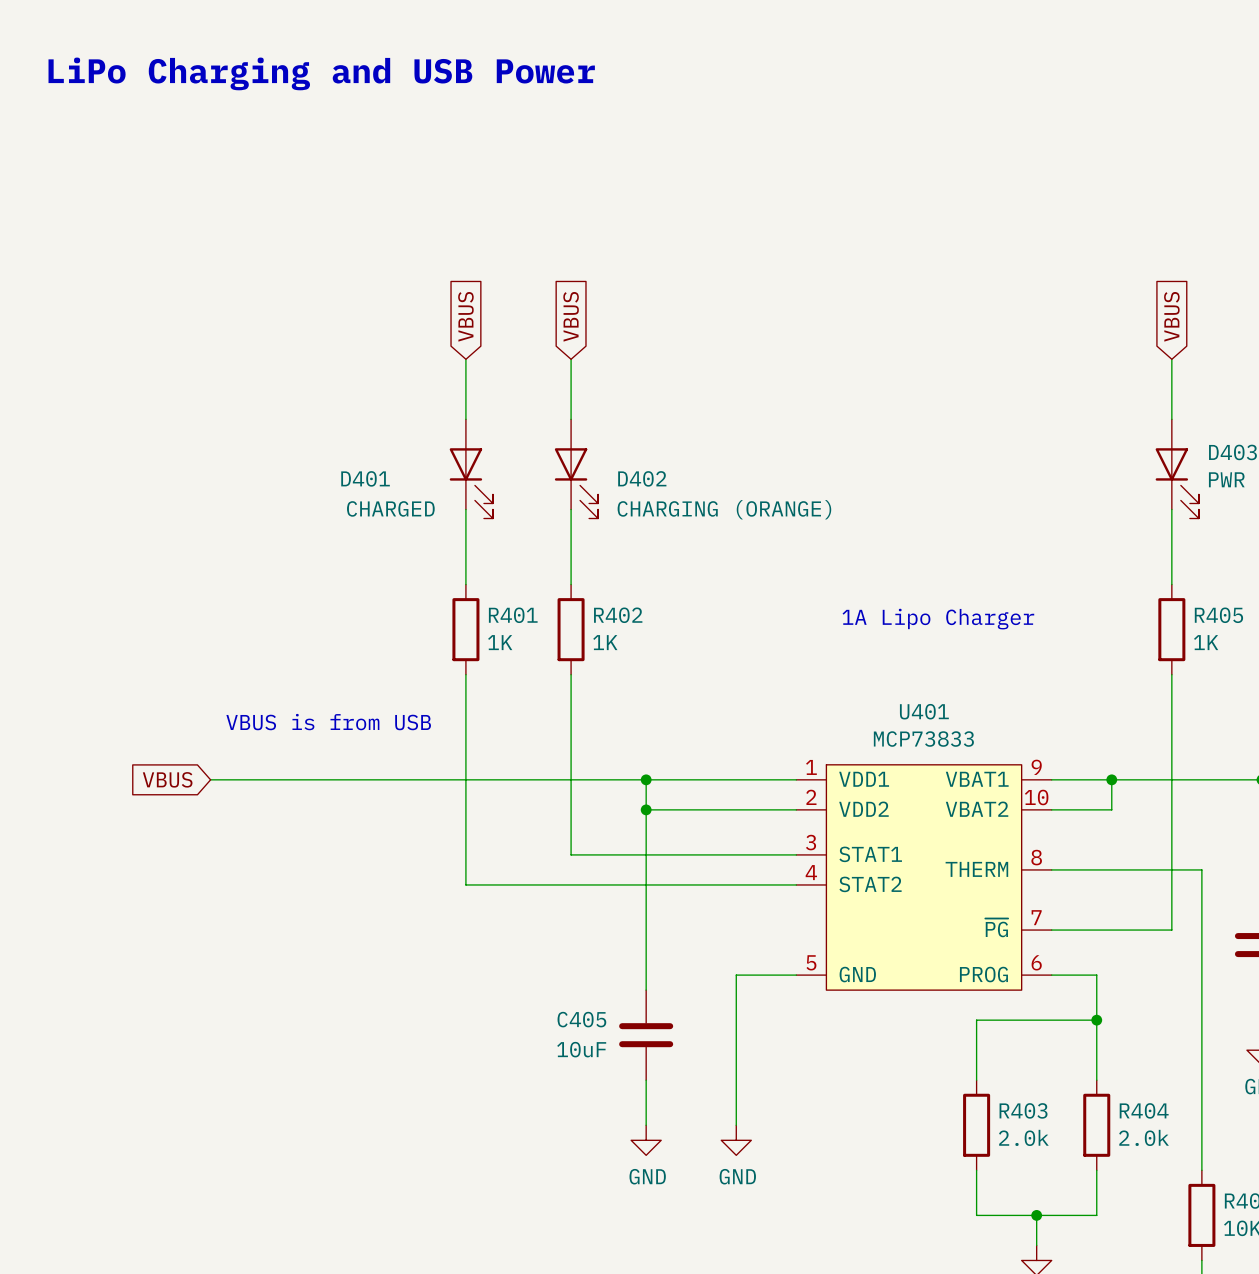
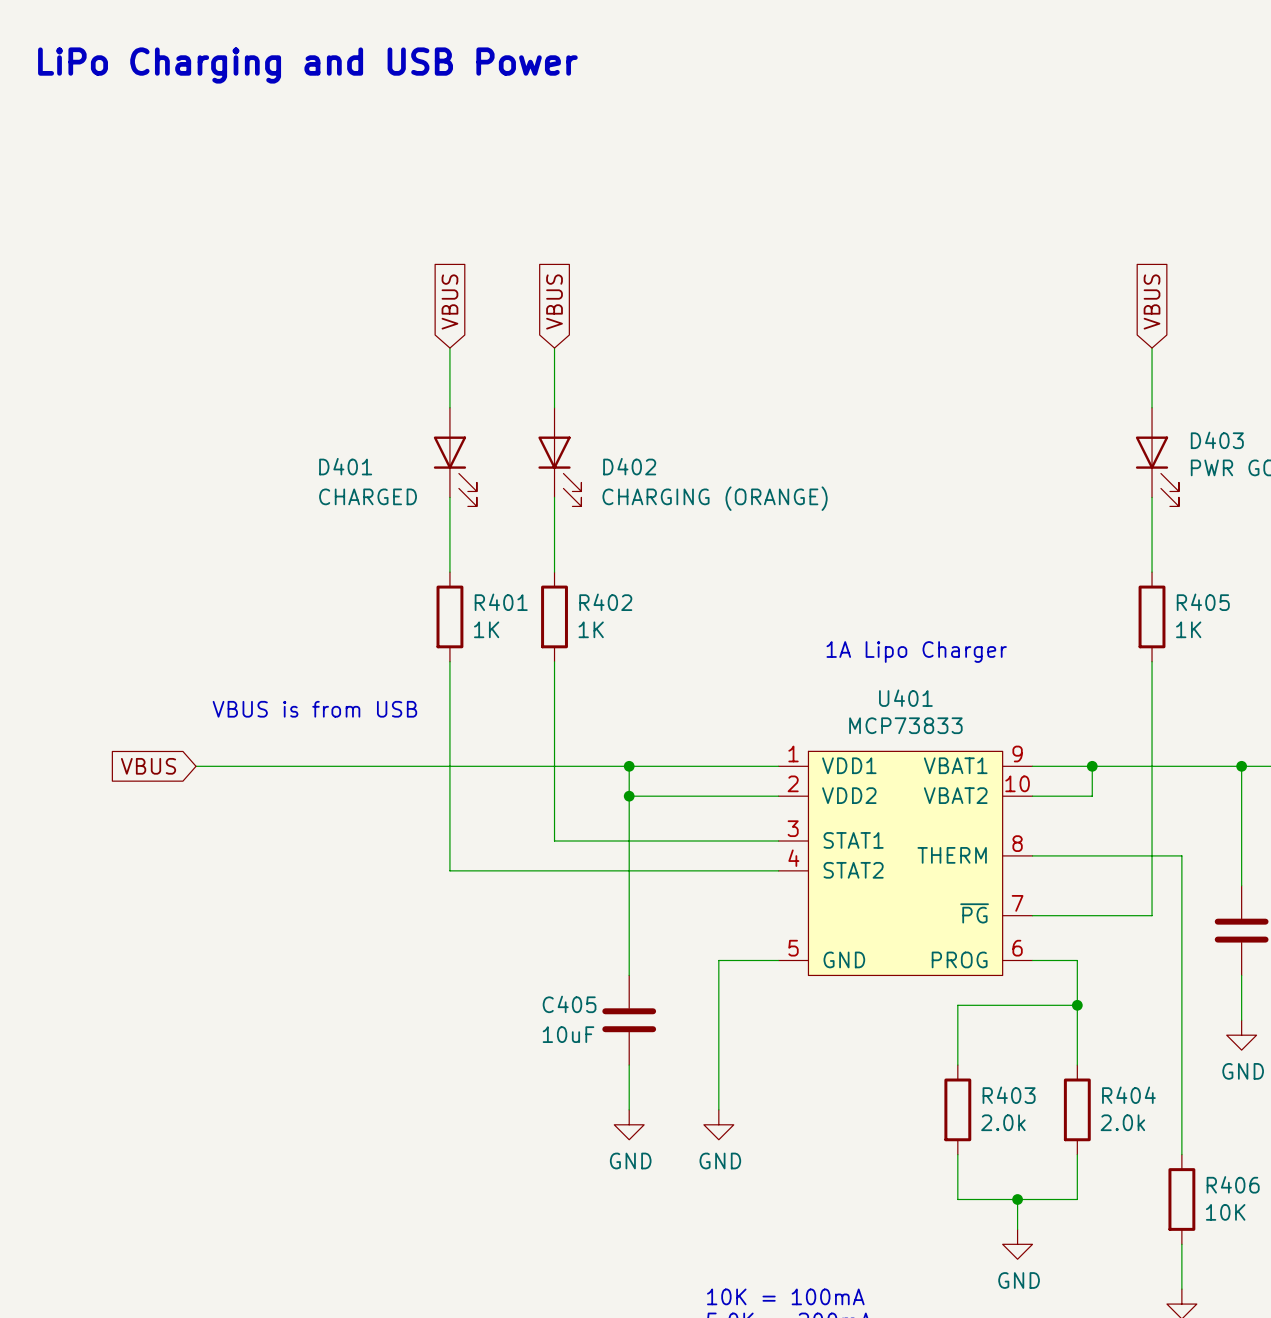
text position: 1A Lipo Charger (938, 619) -> 1A Lipo Charger (916, 652)

